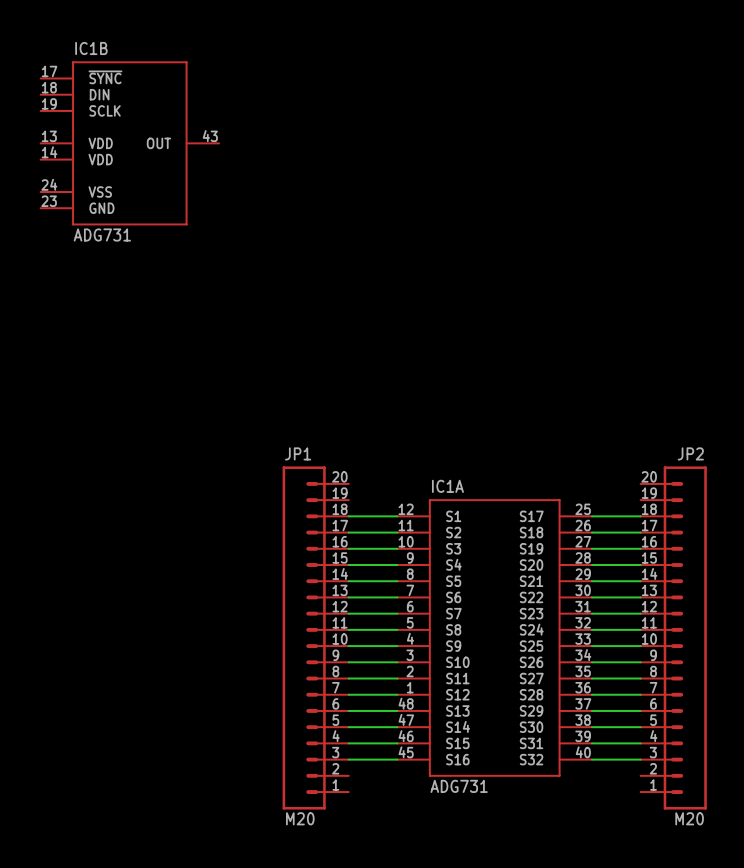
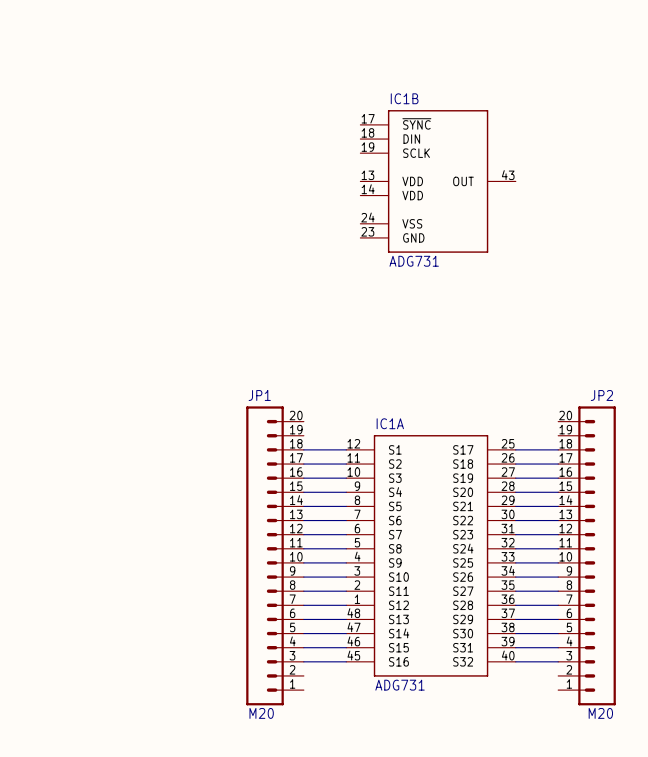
IC1B position: (129, 143) -> (438, 181)

